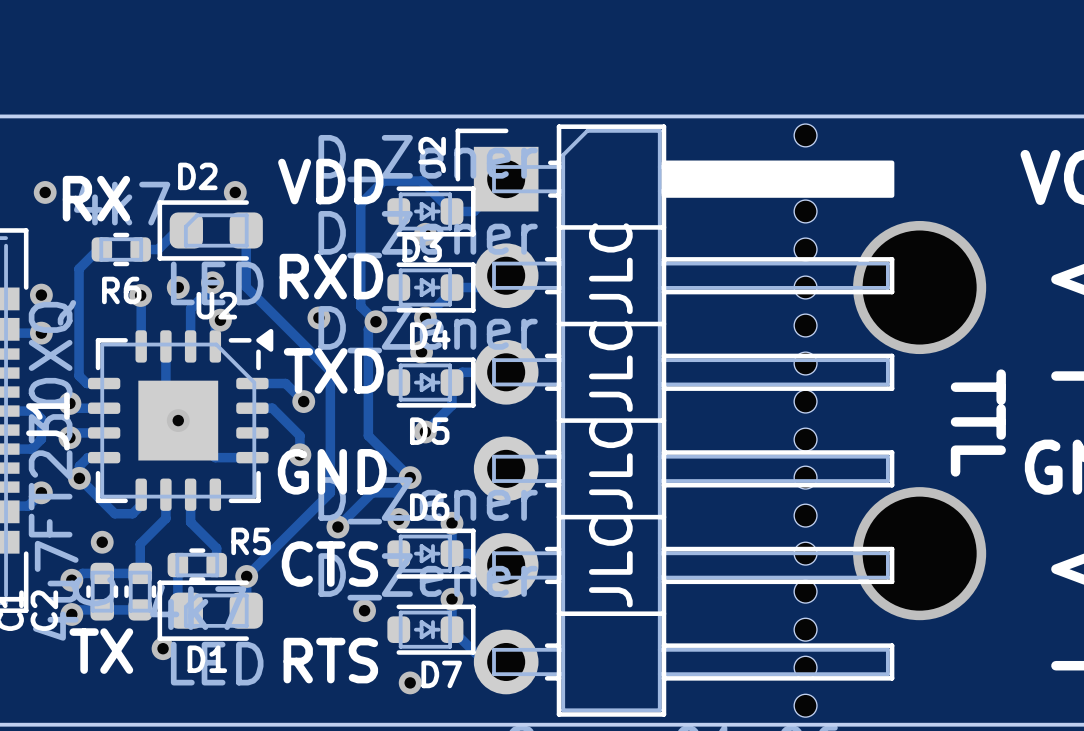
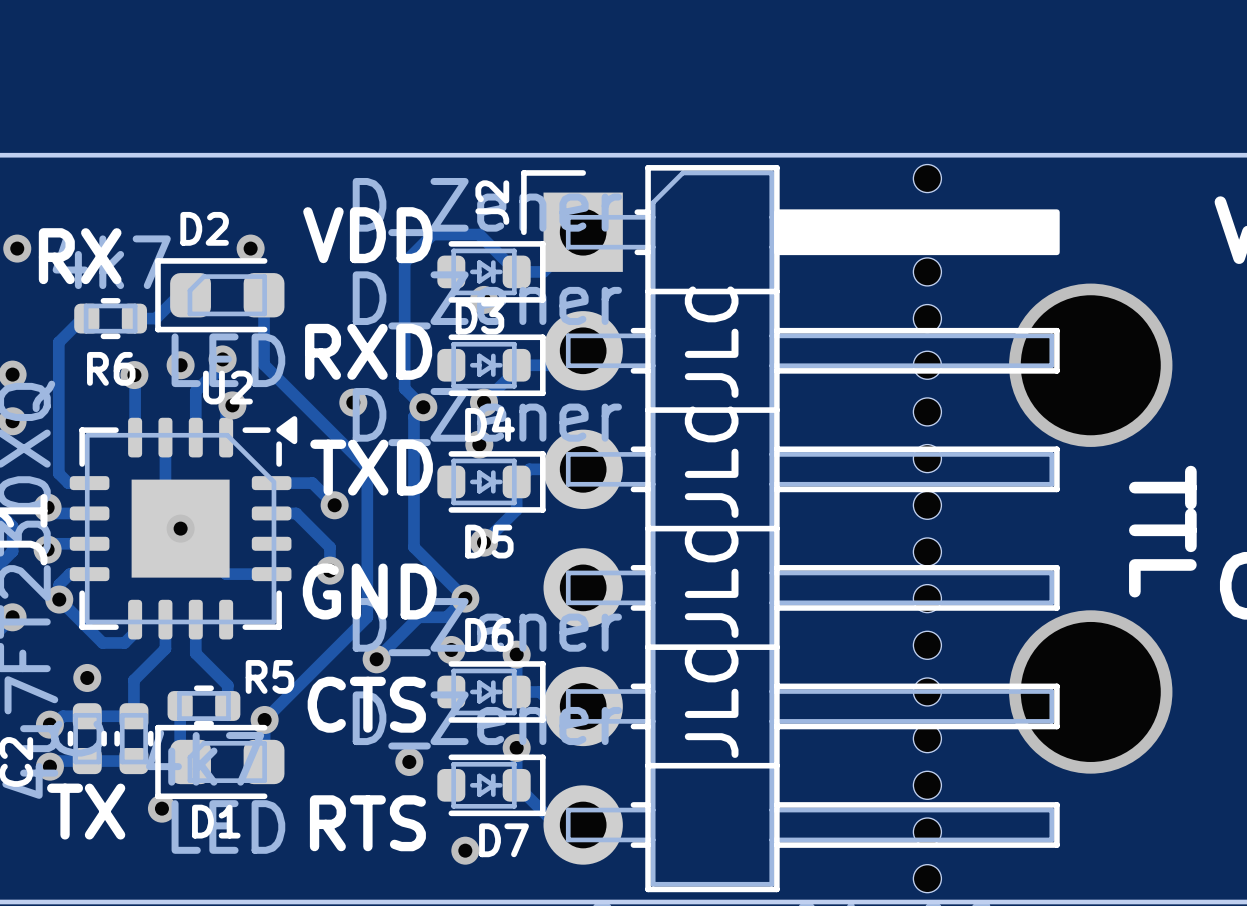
part position: (805, 192) -> (927, 248)
part position: (805, 344) -> (927, 435)
part position: (805, 496) -> (927, 621)
part position: (805, 648) -> (927, 808)

